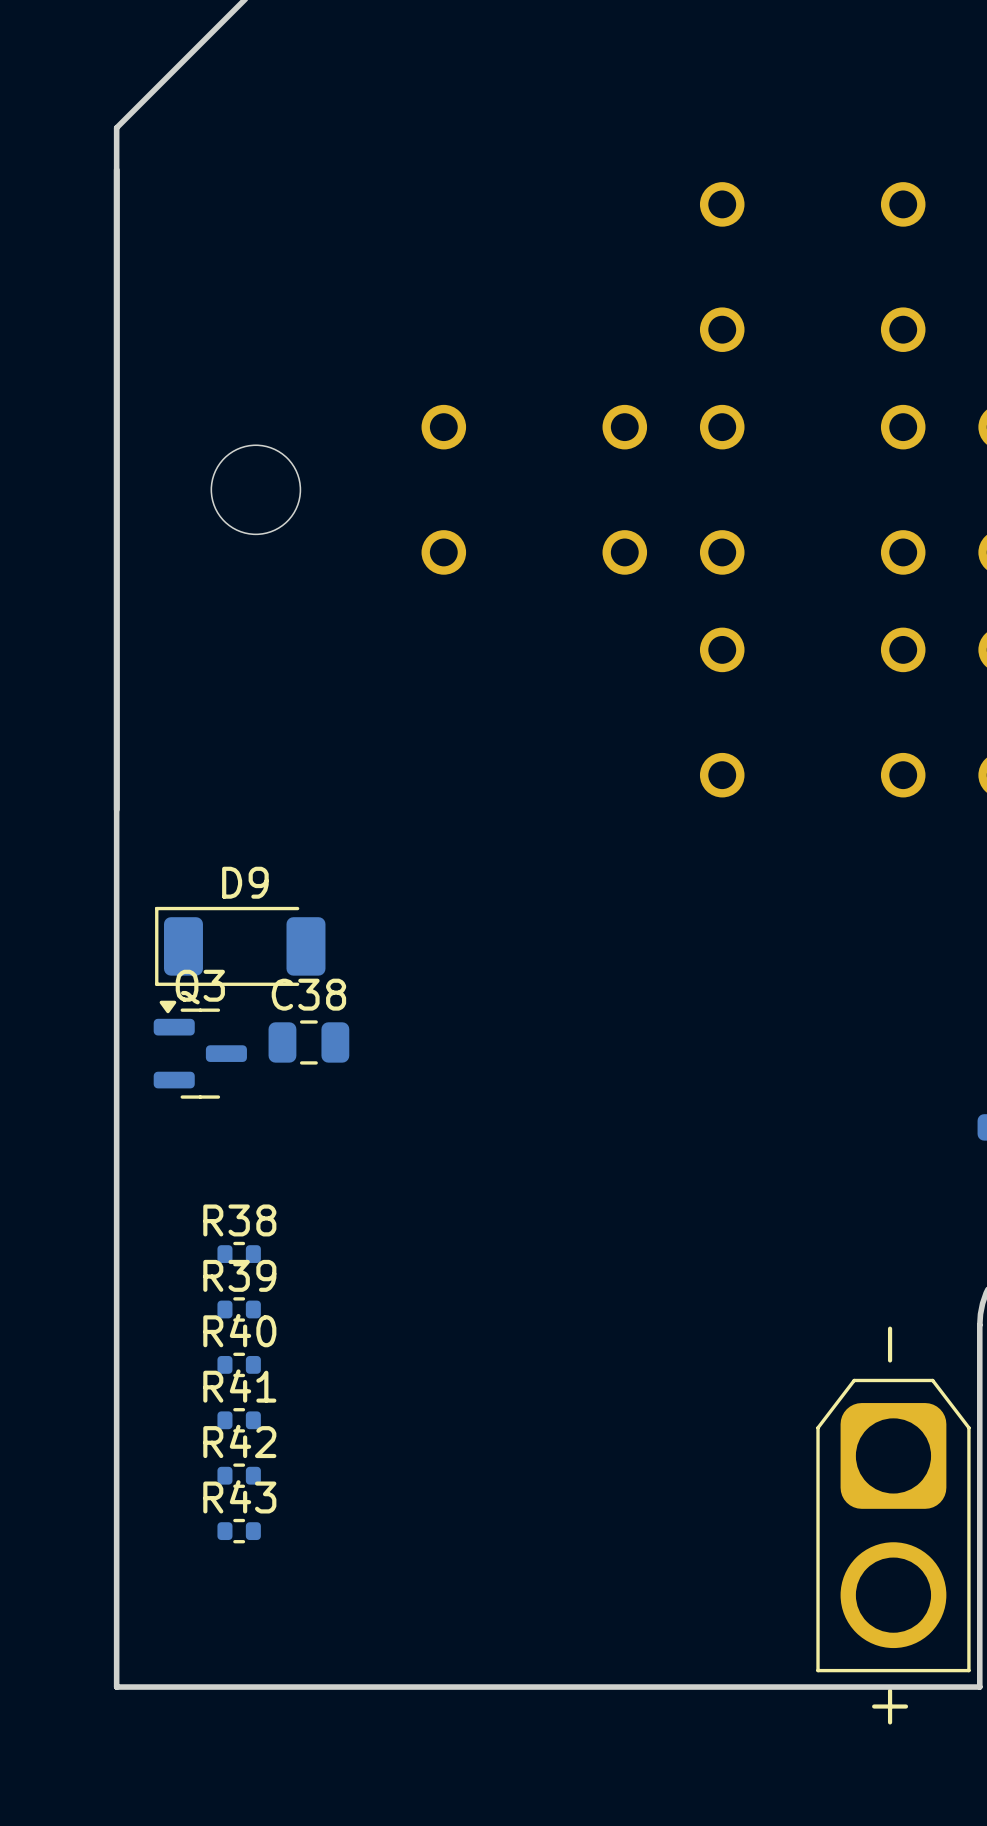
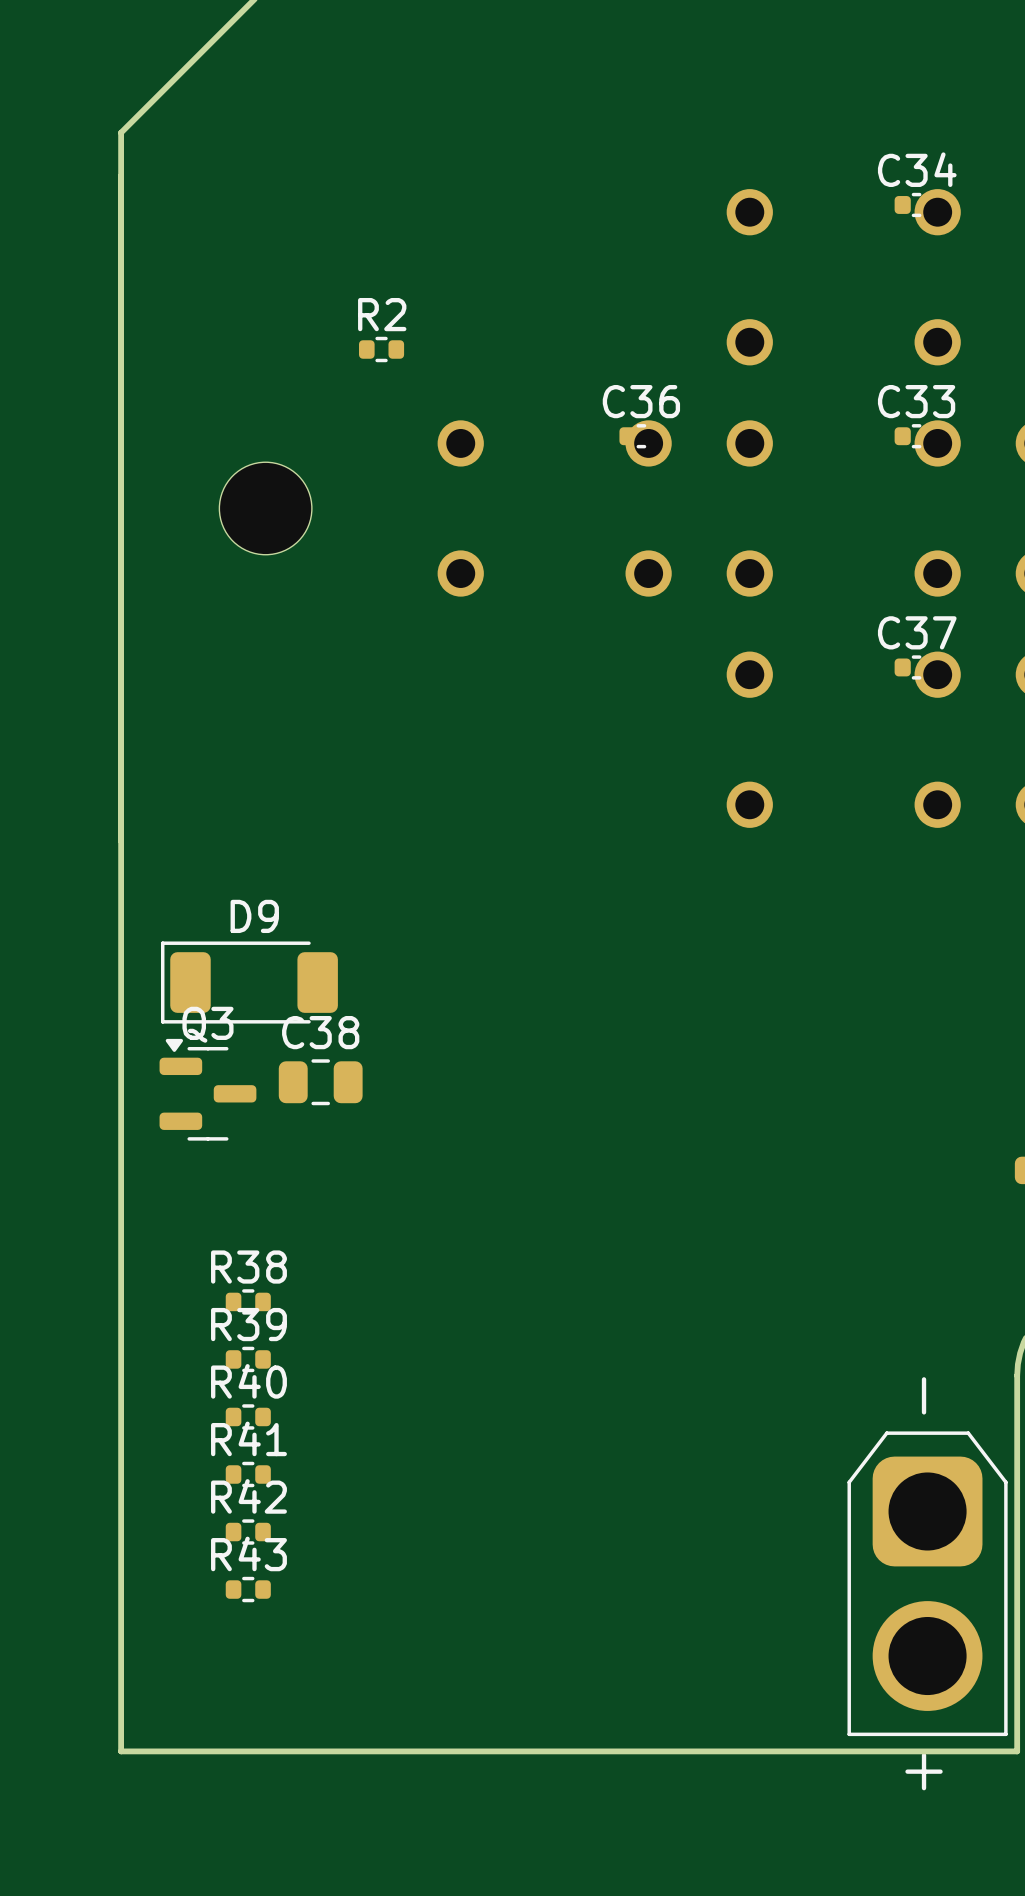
C34: none -> (916, 204)
R2: none -> (381, 349)
C36: none -> (641, 436)
C33: none -> (916, 436)
C37: none -> (916, 667)

